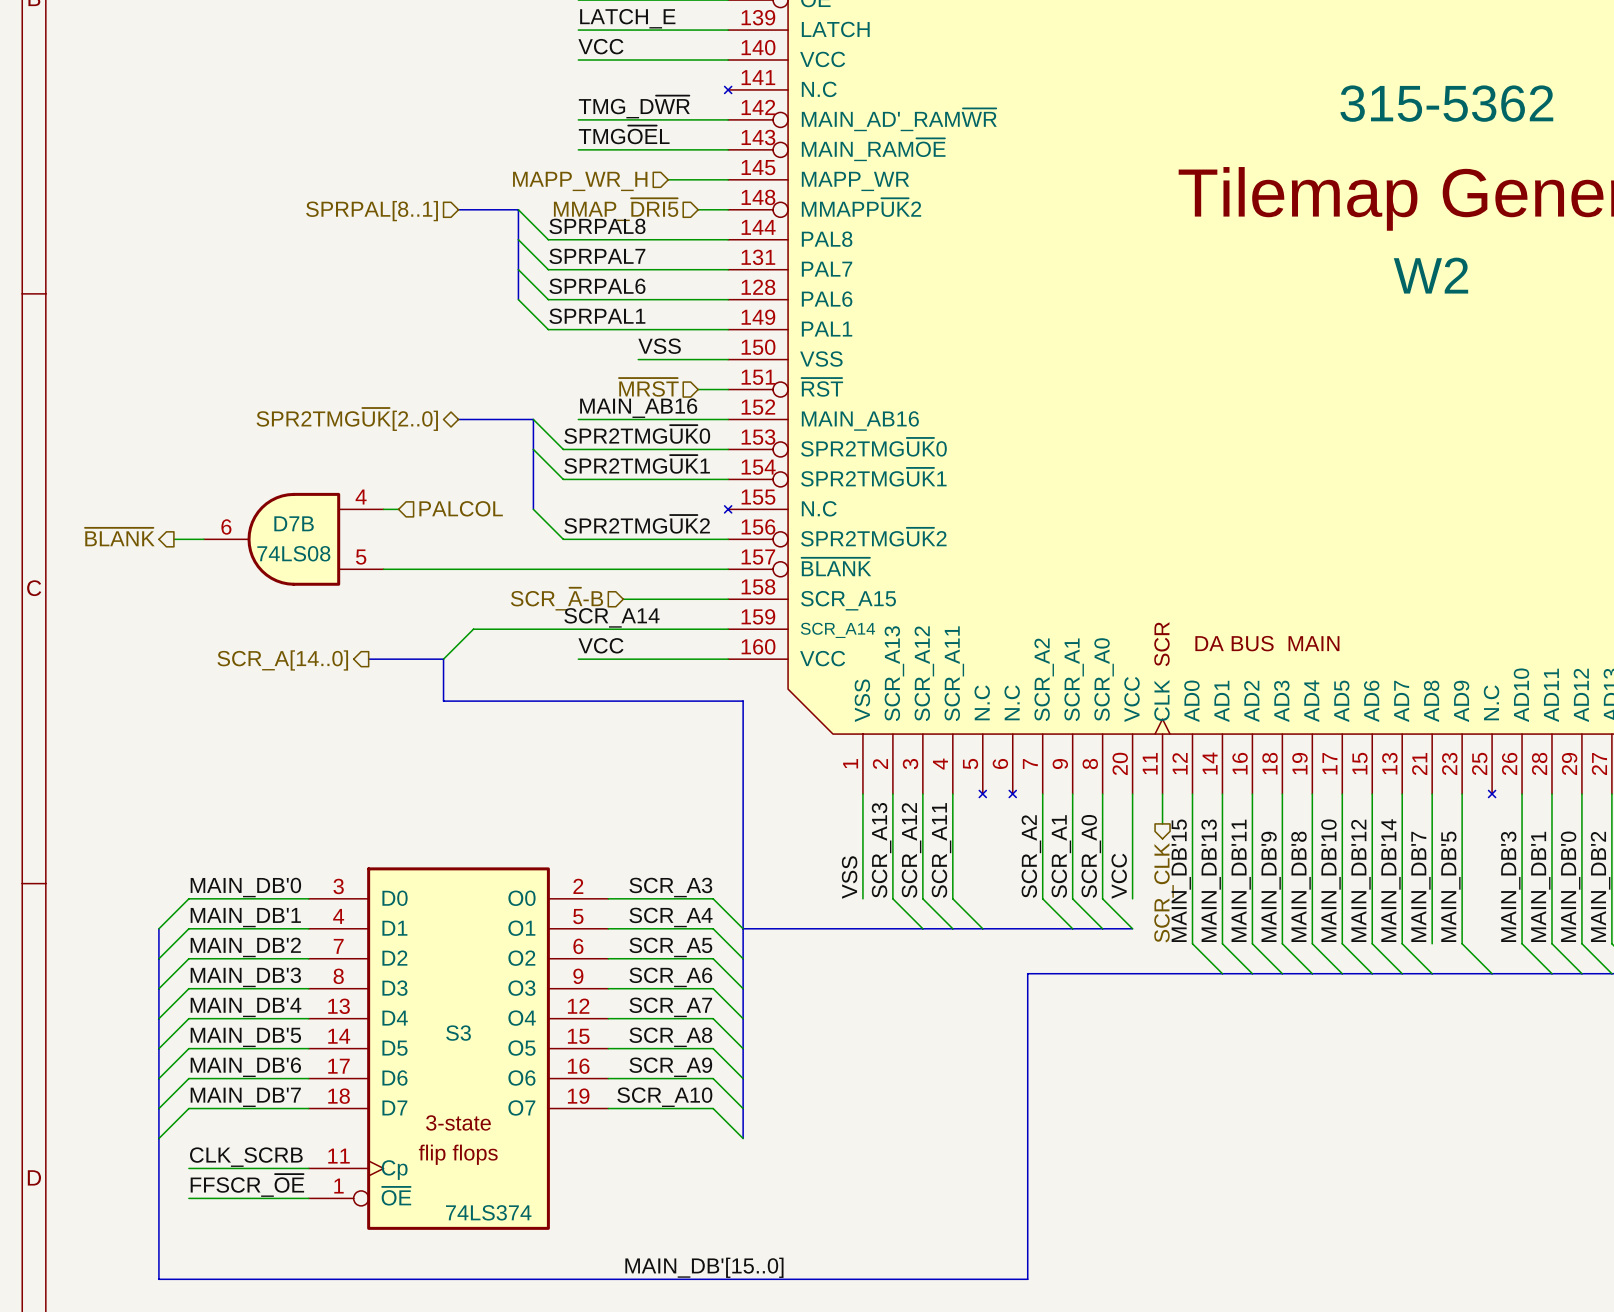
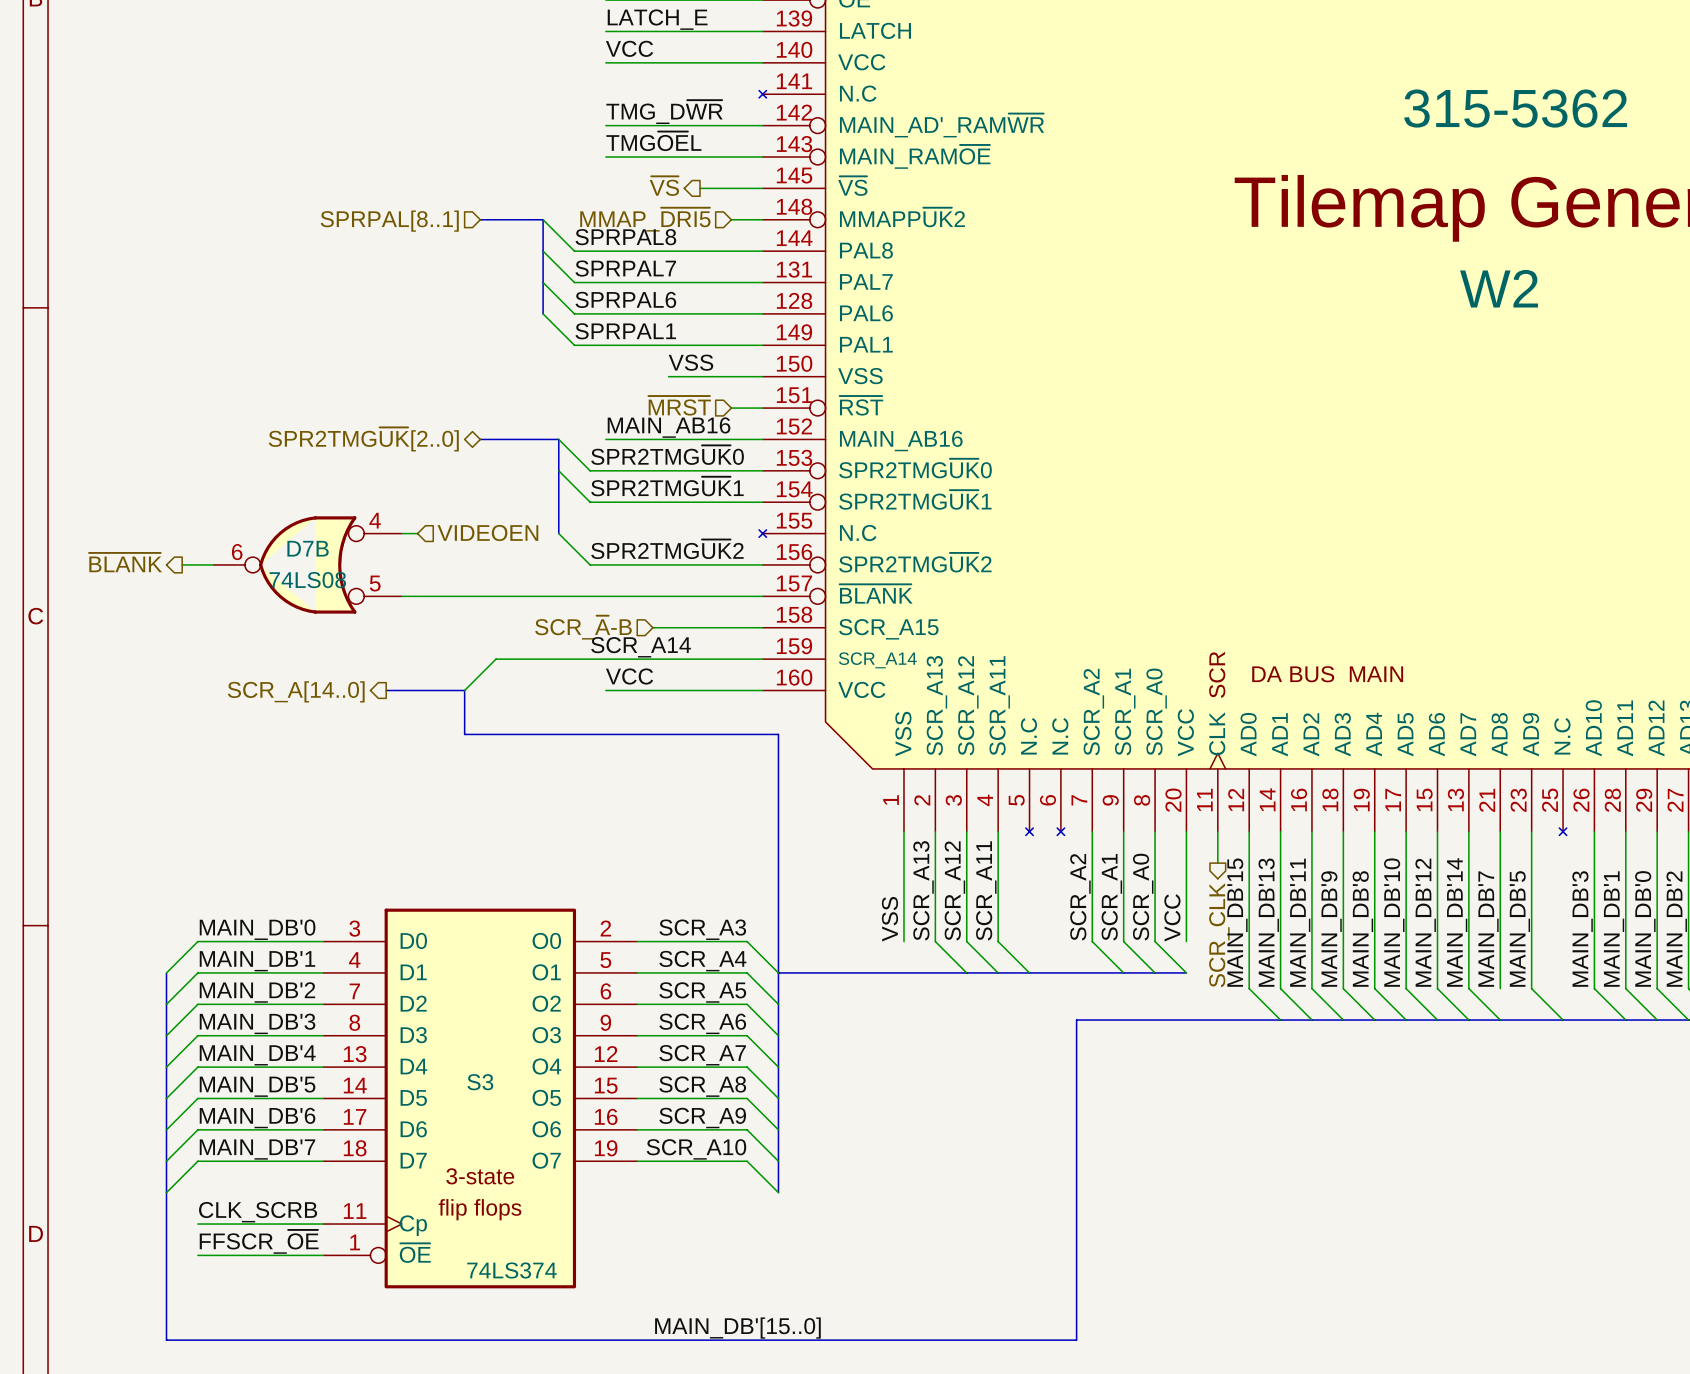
hierarchical label shape: input (580, 181) -> output (664, 186)
hierarchical label: MAPP_WR_H (580, 181) -> ~{VS} (664, 186)
W2 pin name: MAPP_WR (855, 181) -> ~{VS} (852, 186)
D7B symbol: [203, 492, 384, 586] -> [213, 516, 402, 614]
hierarchical label: PALCOL (461, 508) -> VIDEOEN (487, 533)

